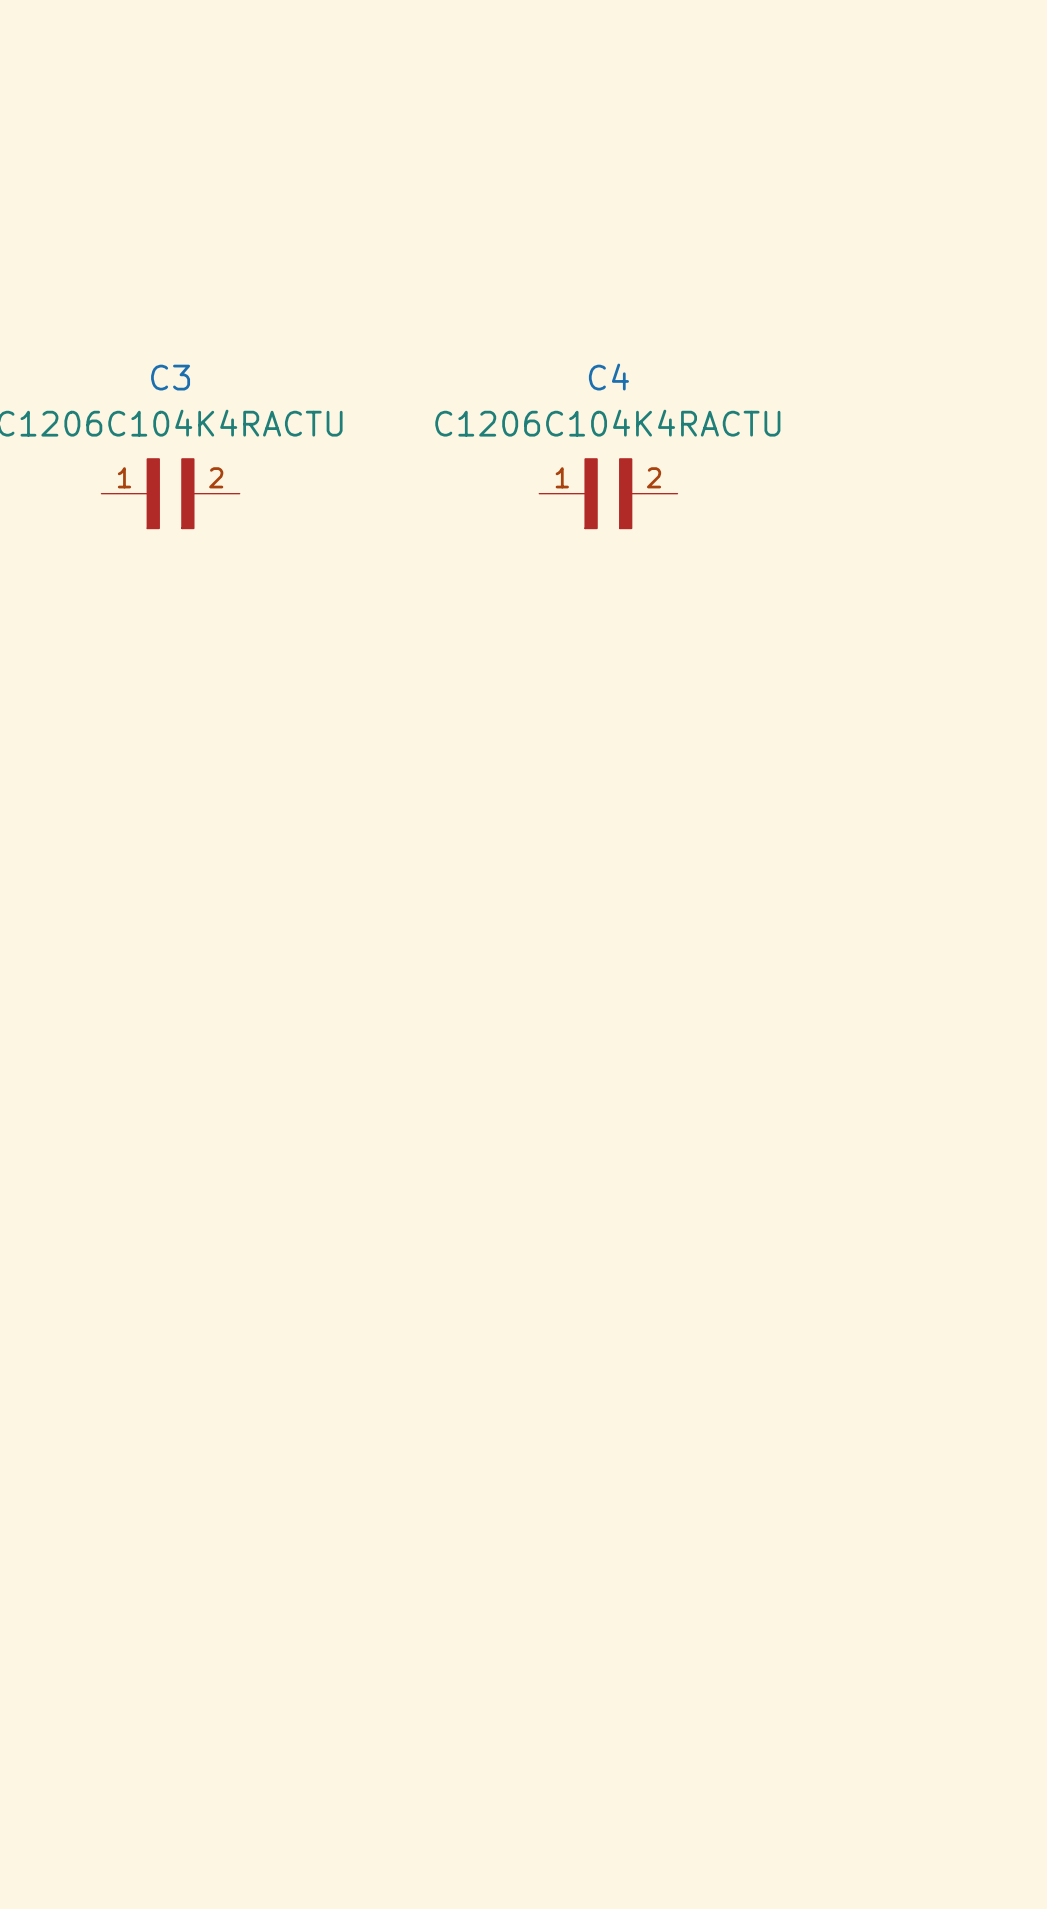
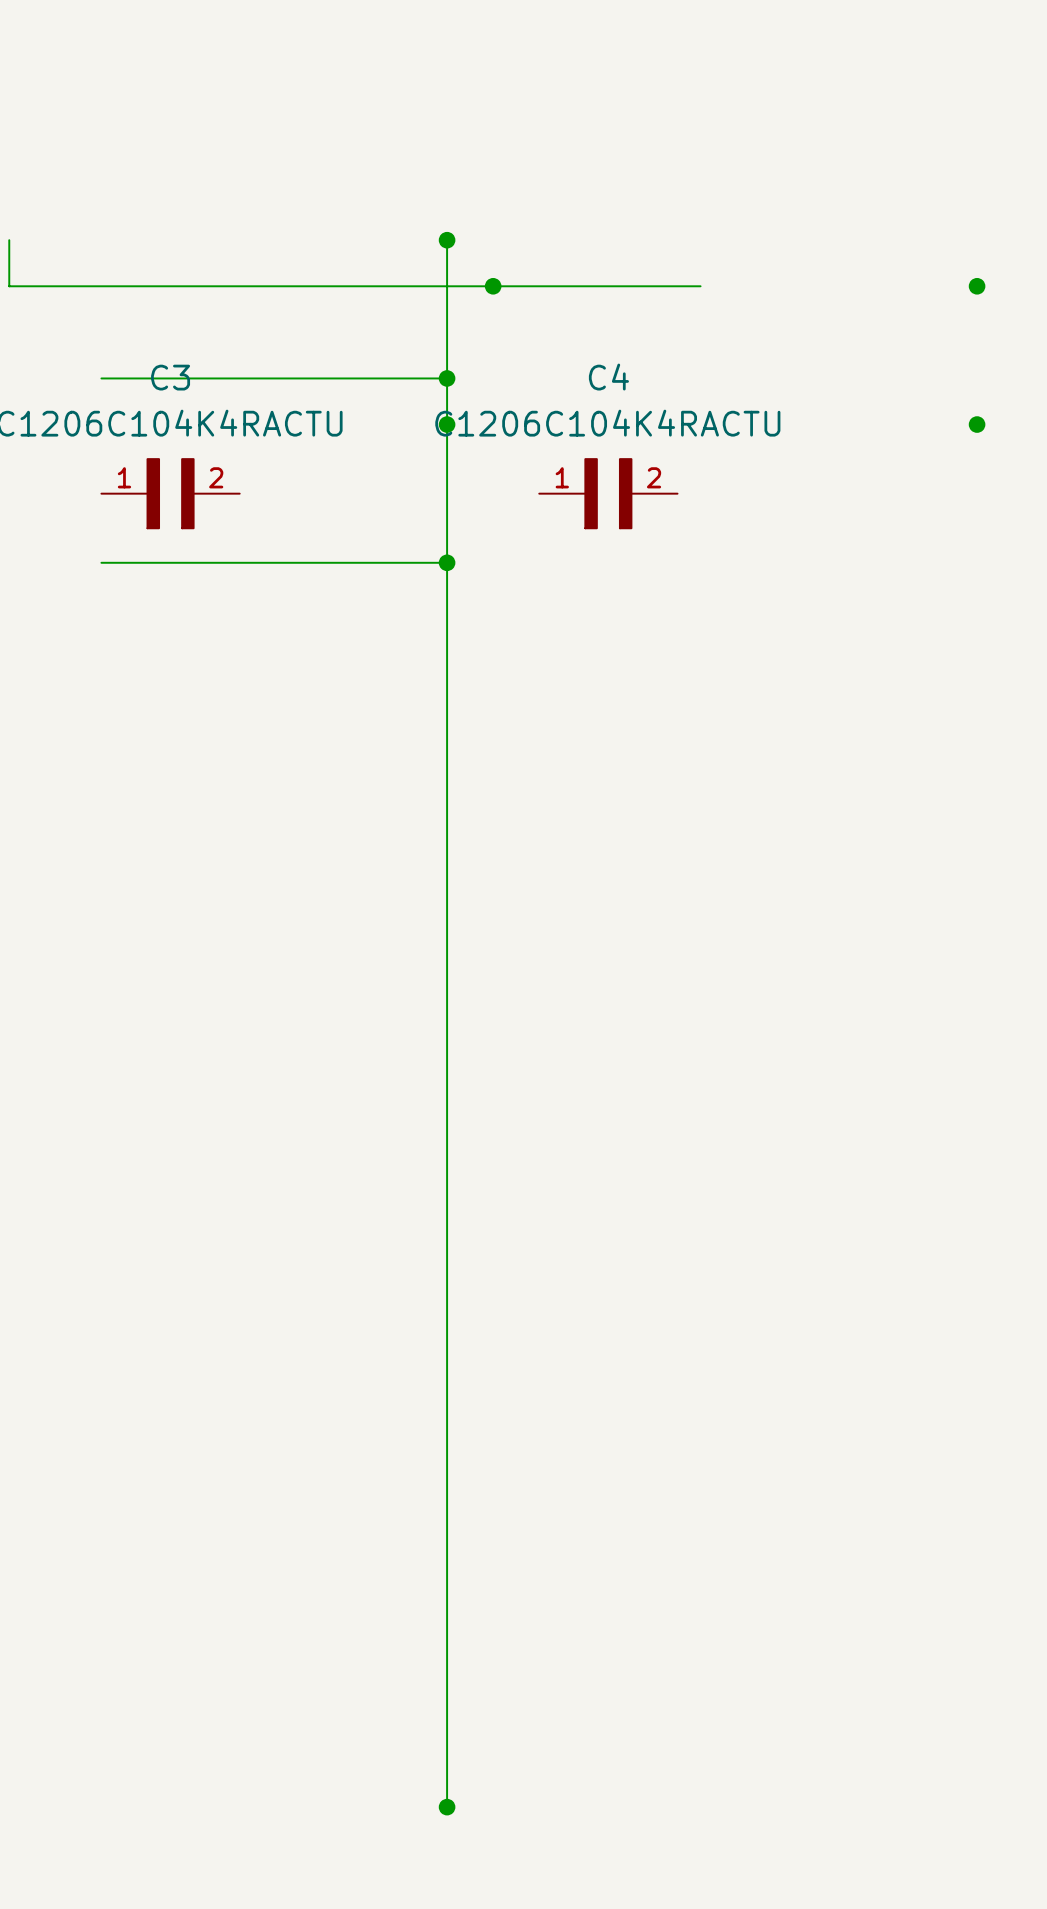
wire: none -> (9, 240) (9, 286) (700, 286)
wire: none -> (447, 240) (447, 1807)
junction: none -> (447, 240)
junction: none -> (493, 286)
junction: none -> (977, 286)
wire: none -> (101, 378) (447, 378)
junction: none -> (447, 378)
junction: none -> (447, 424)
junction: none -> (977, 424)
wire: none -> (101, 562) (447, 562)
junction: none -> (447, 562)
junction: none -> (447, 1807)

